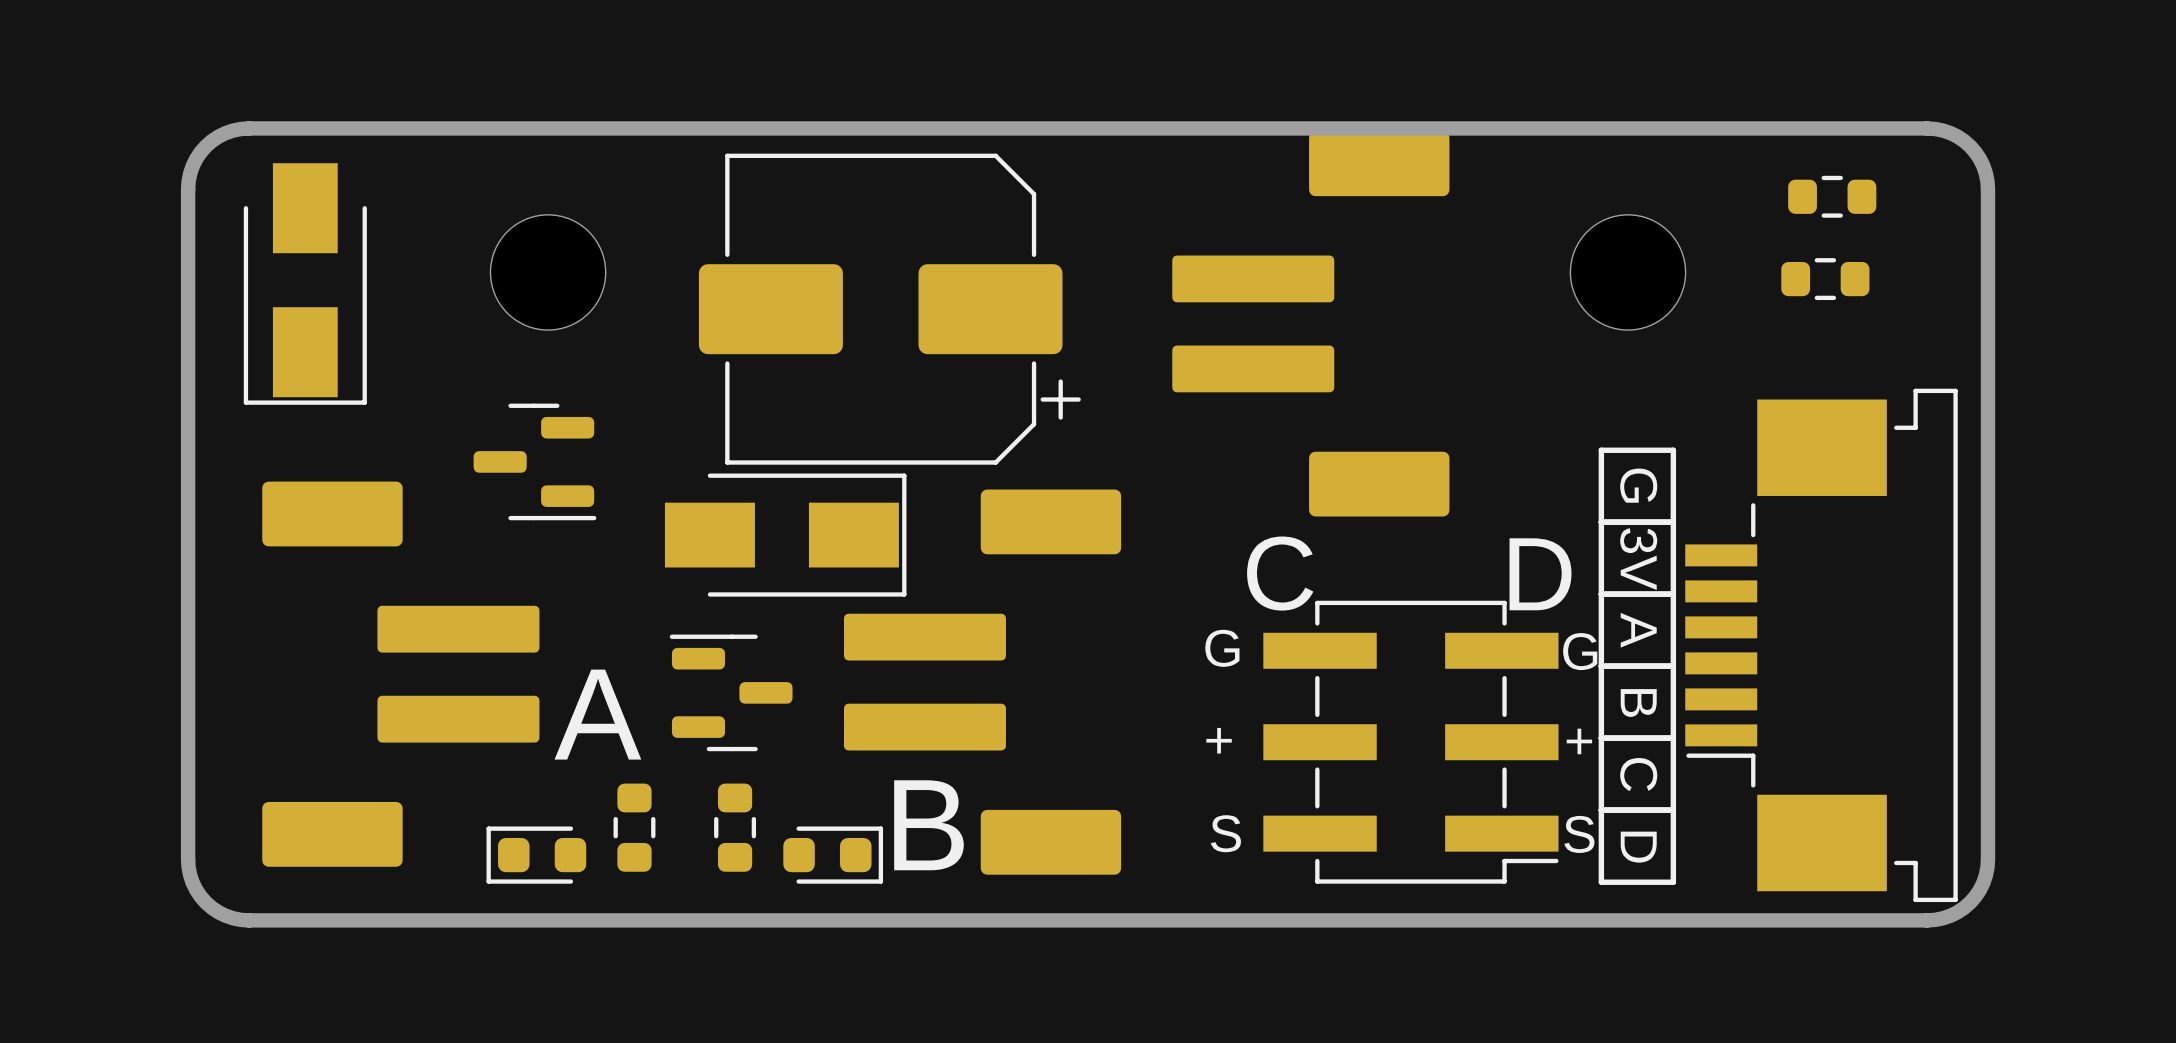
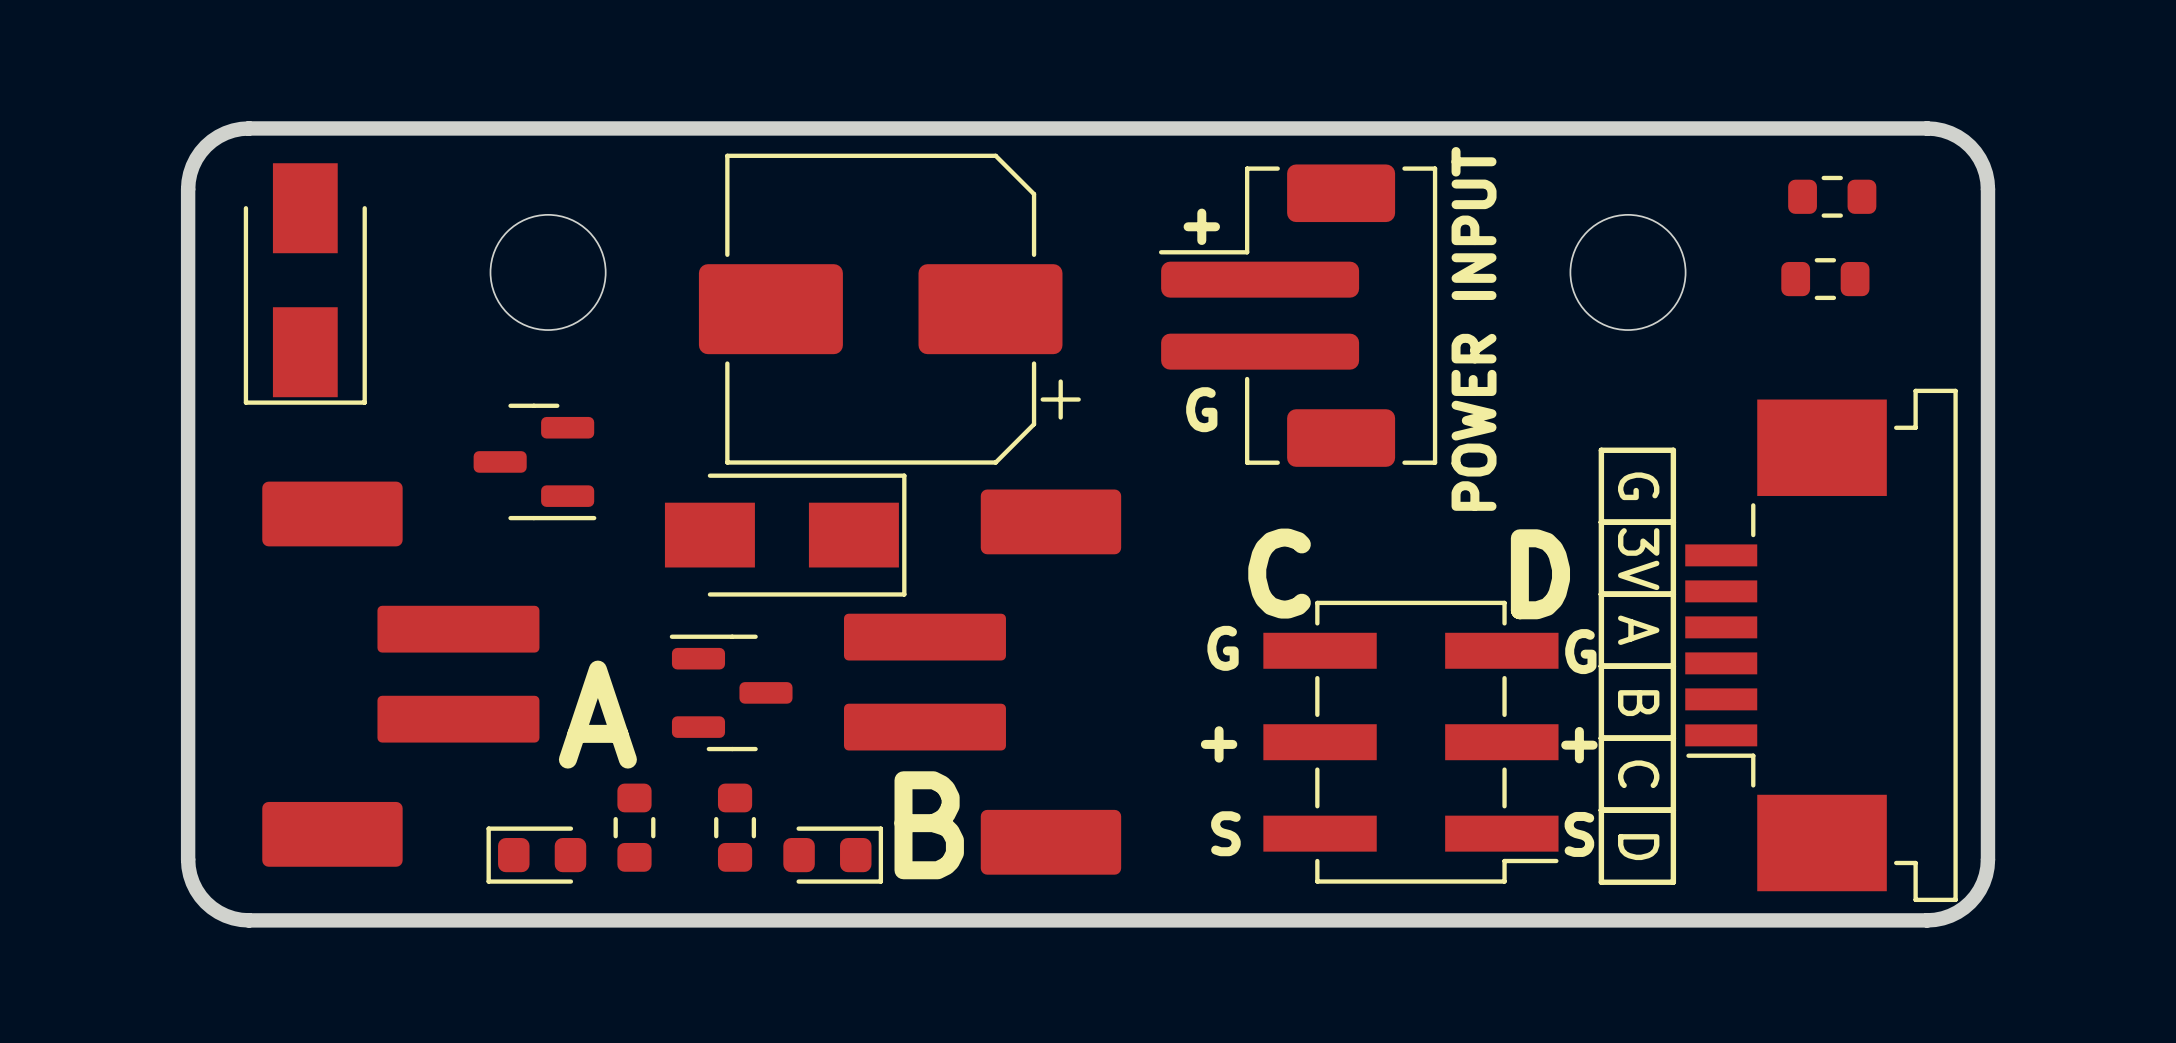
part footprint: [1172, 131, 1450, 517] -> [1158, 164, 1438, 467]
text: none -> + (1201, 226)
text: none -> POWER INPUT (1474, 328)
text: none -> G (1201, 409)

